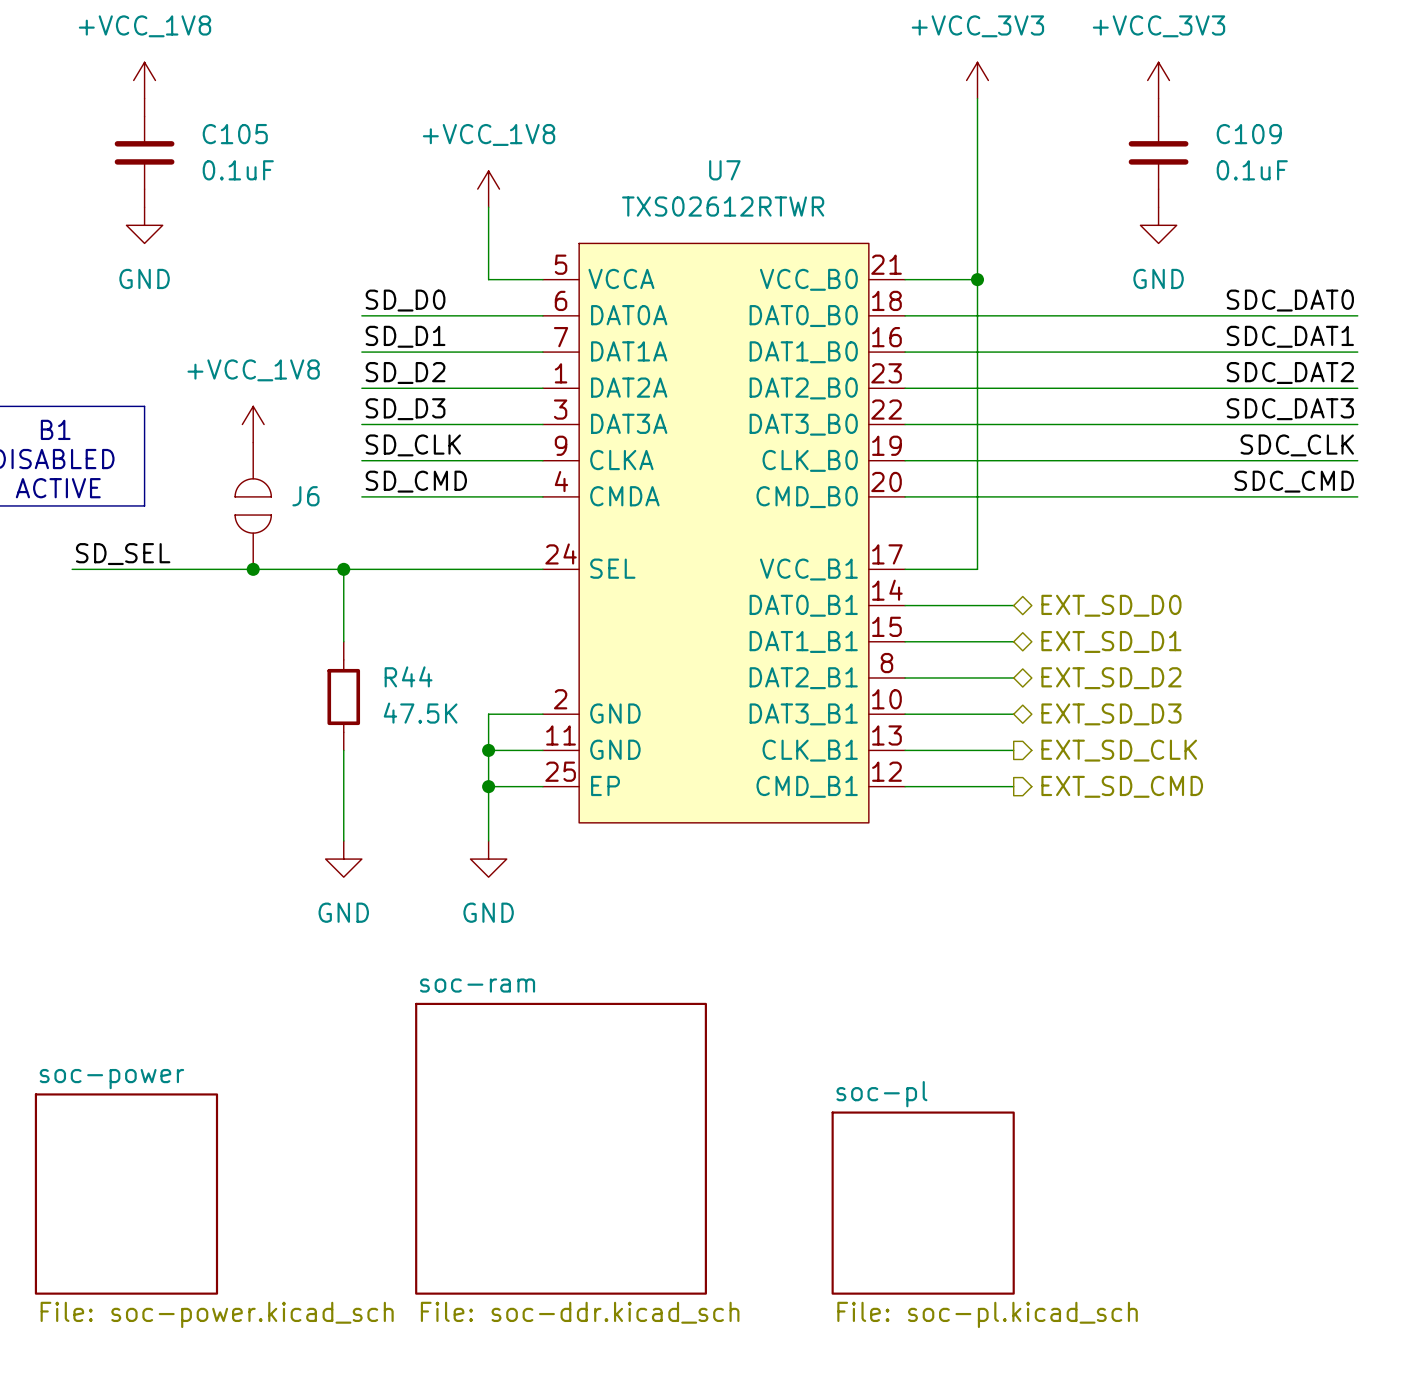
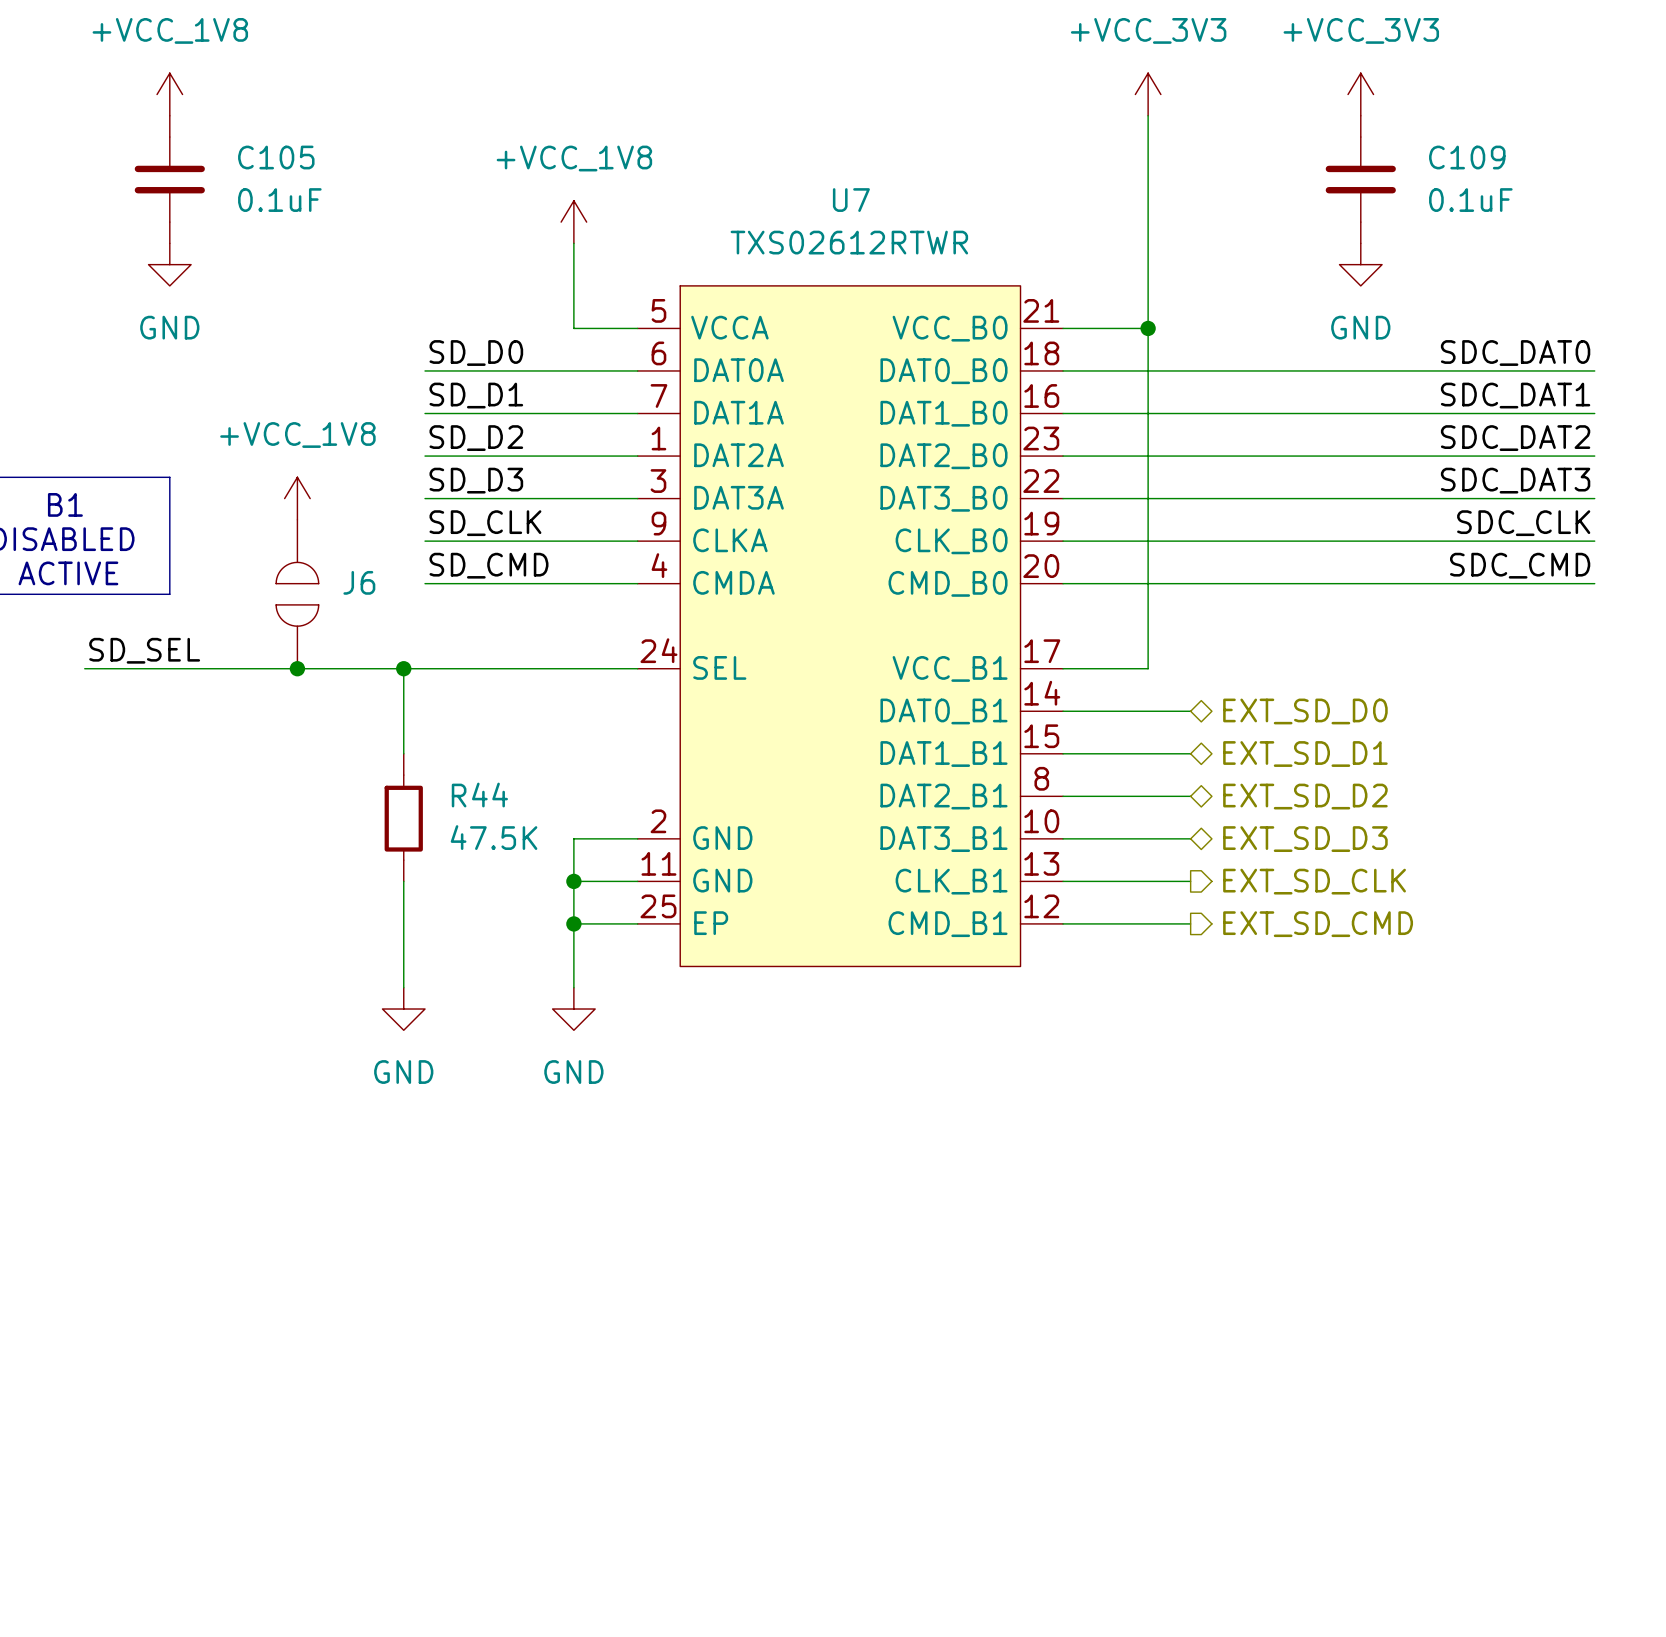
sheet soc-ram: File: soc-ddr.kicad_sch (561, 1148) -> none
sheet soc-power: File: soc-power.kicad_sch (126, 1194) -> none
sheet soc-pl: File: soc-pl.kicad_sch (923, 1203) -> none

